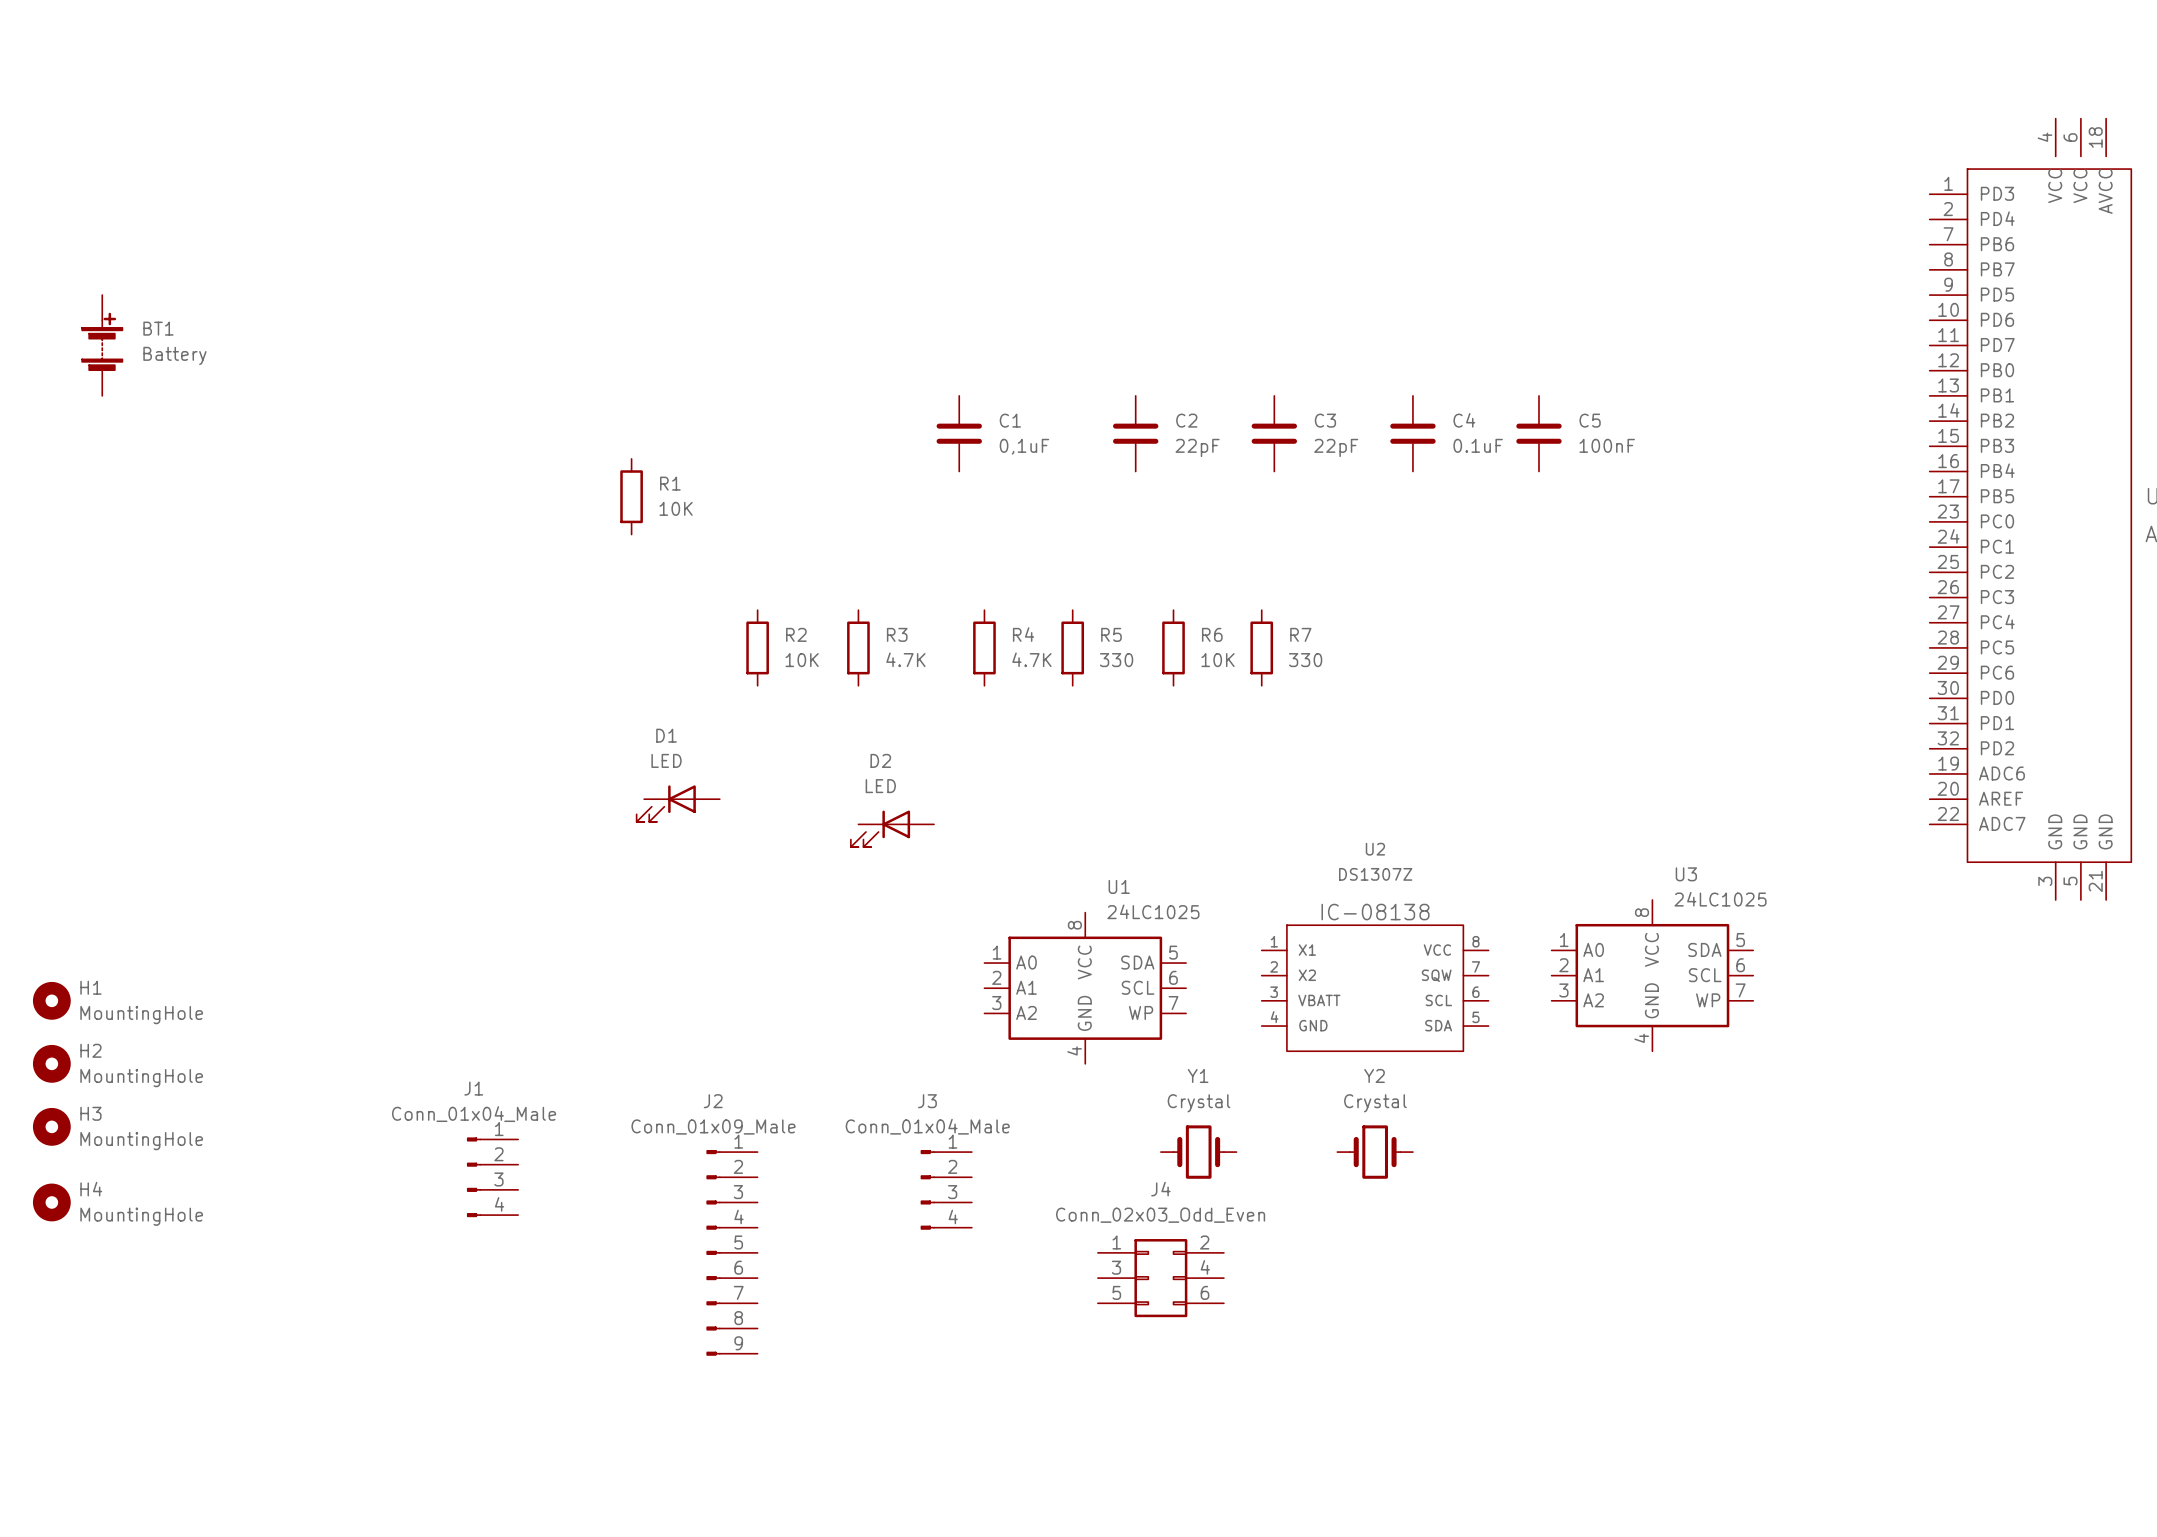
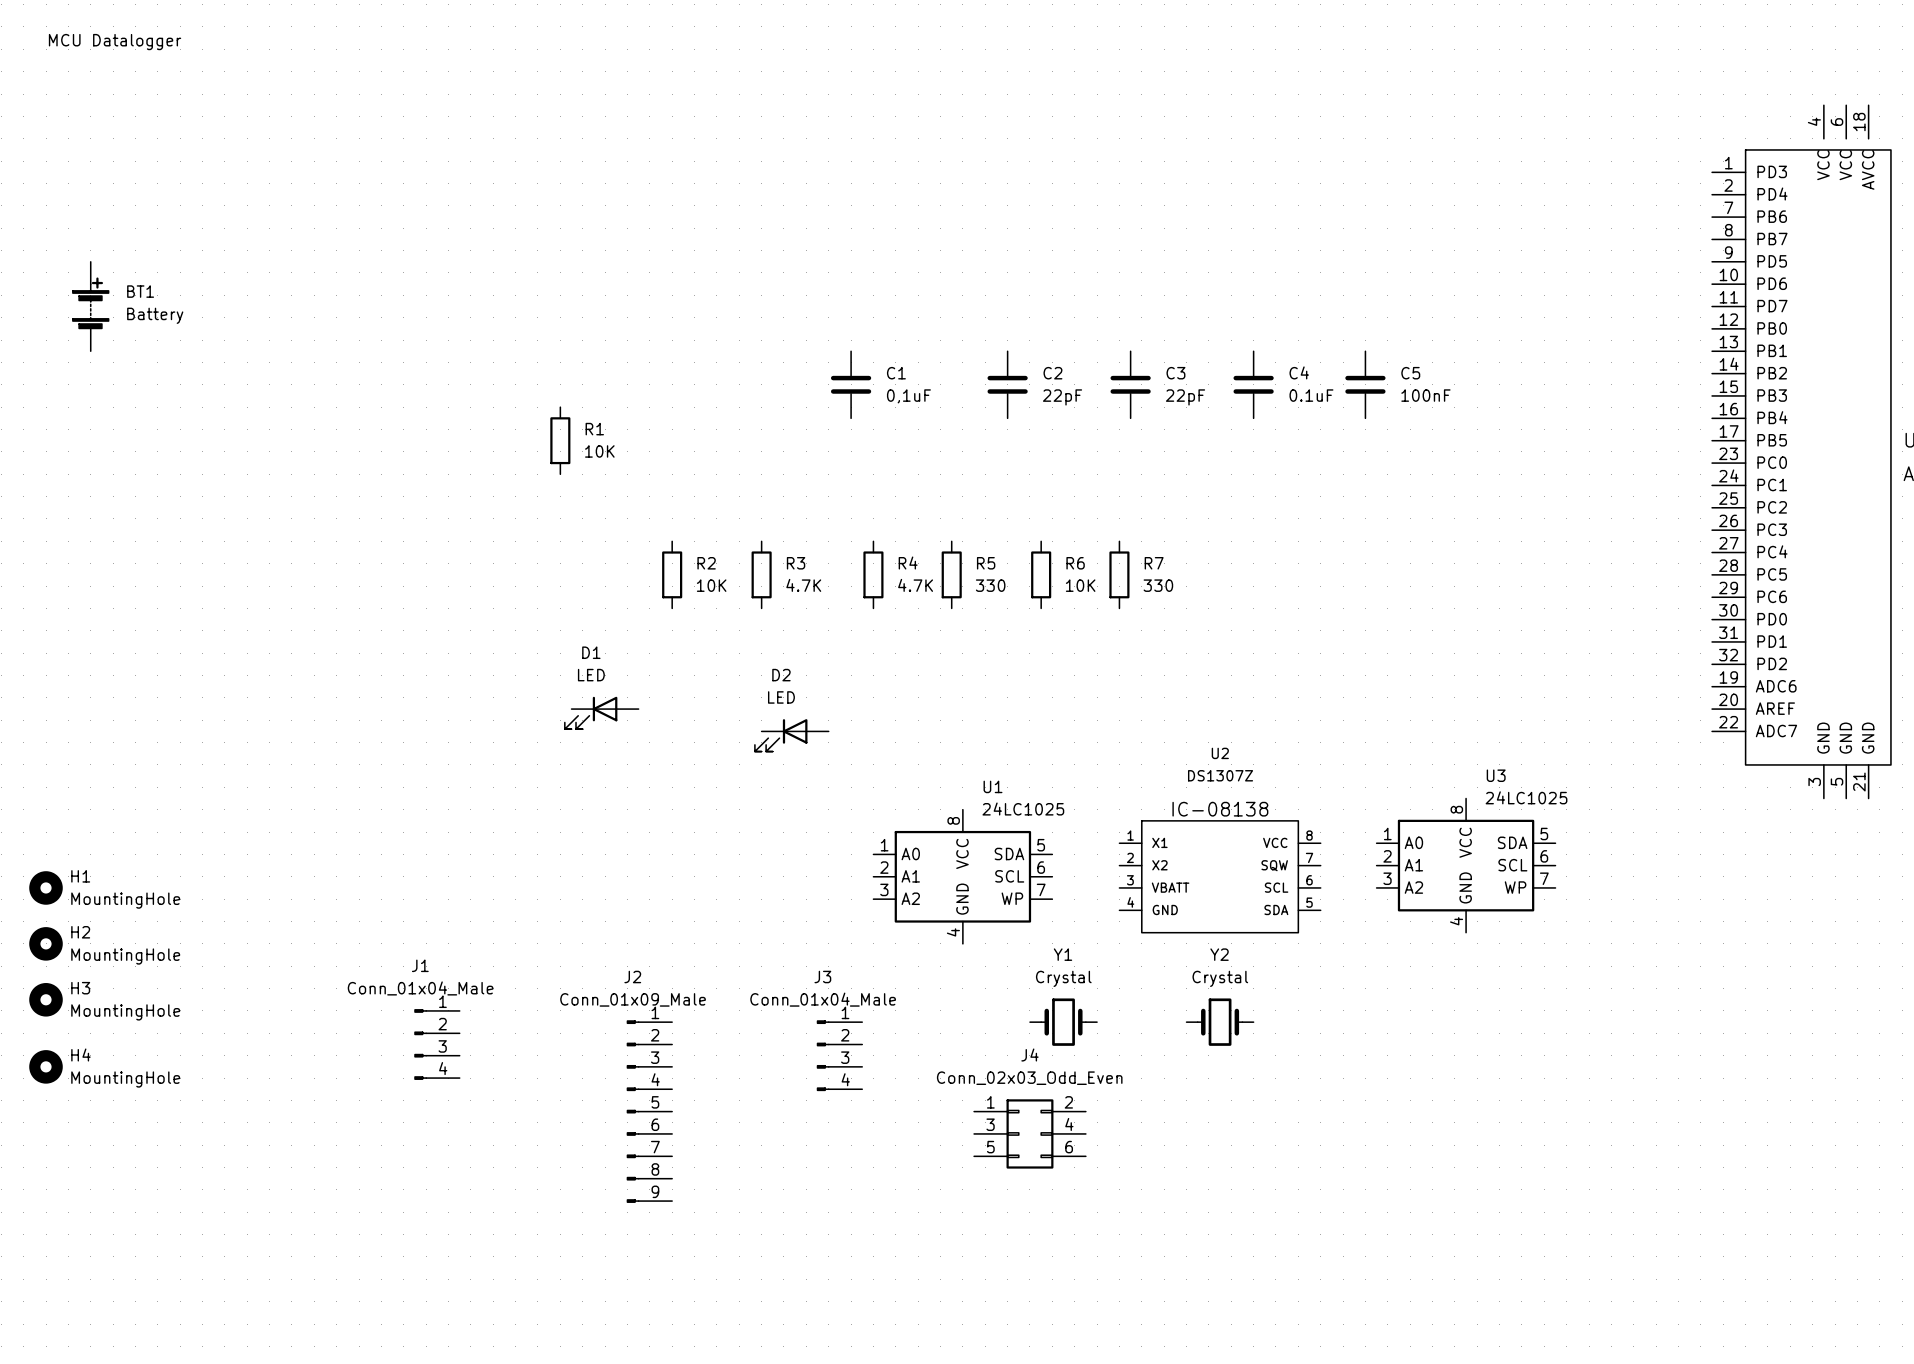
text: none -> MCU Datalogger (115, 42)

